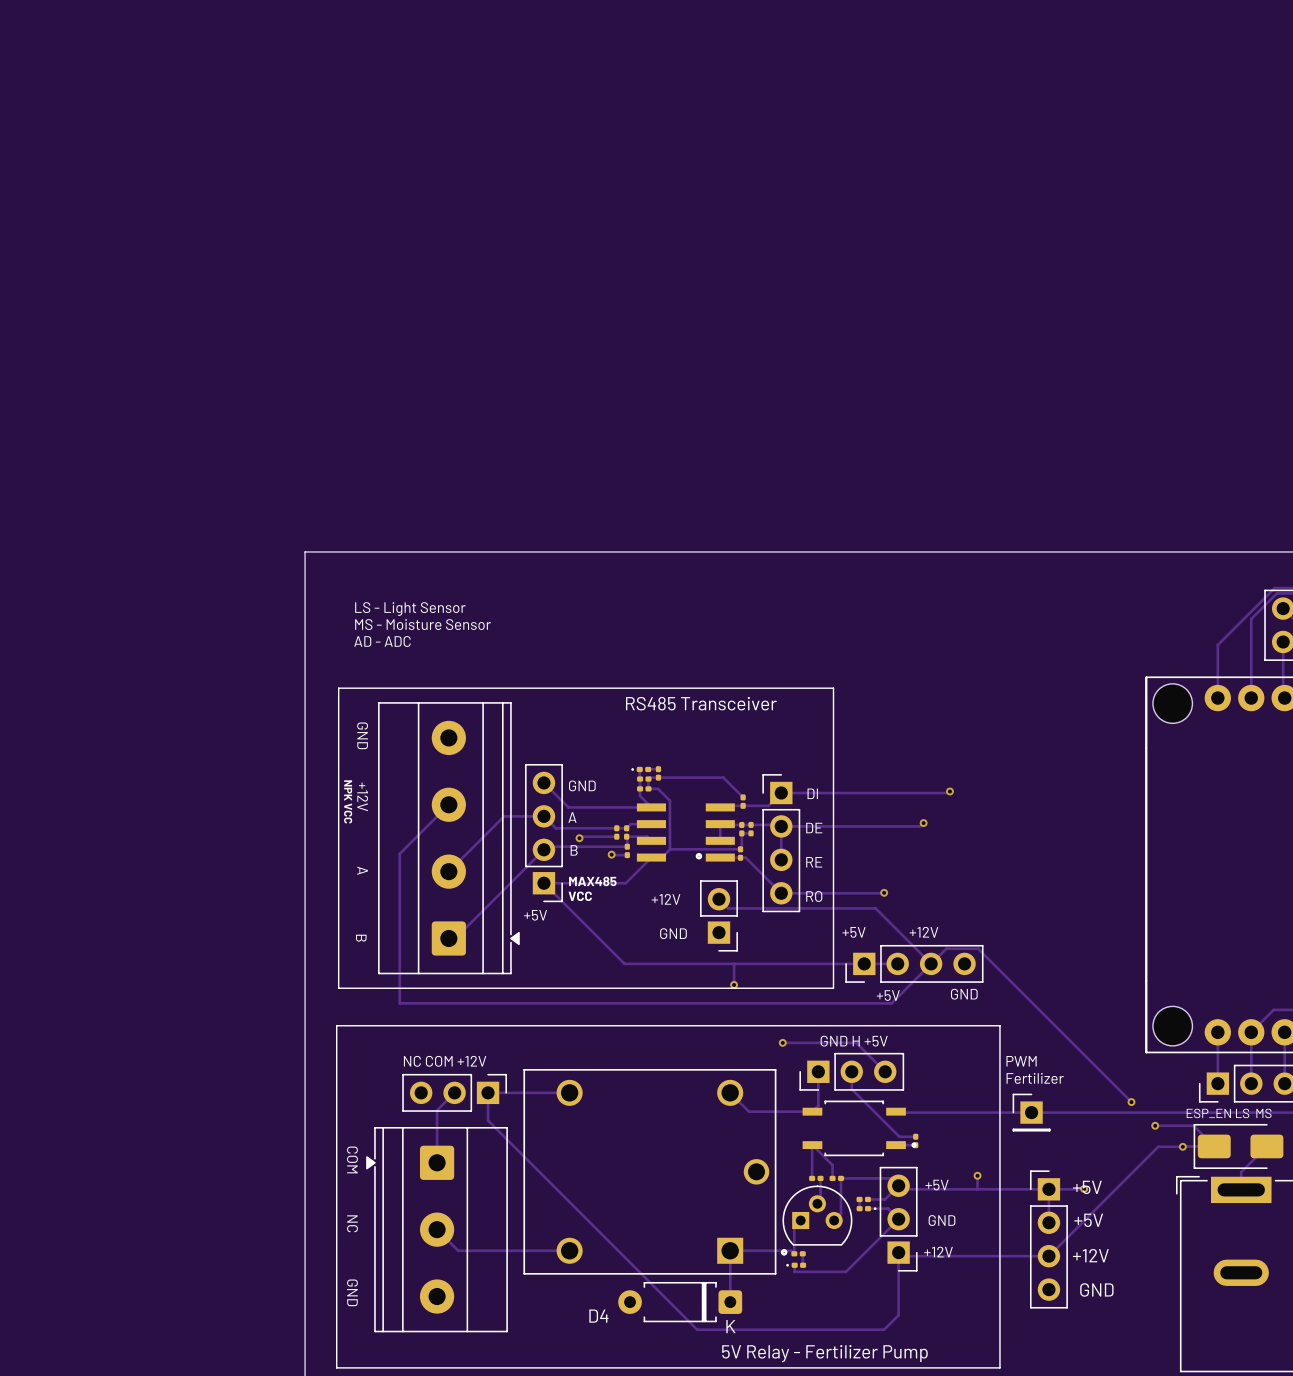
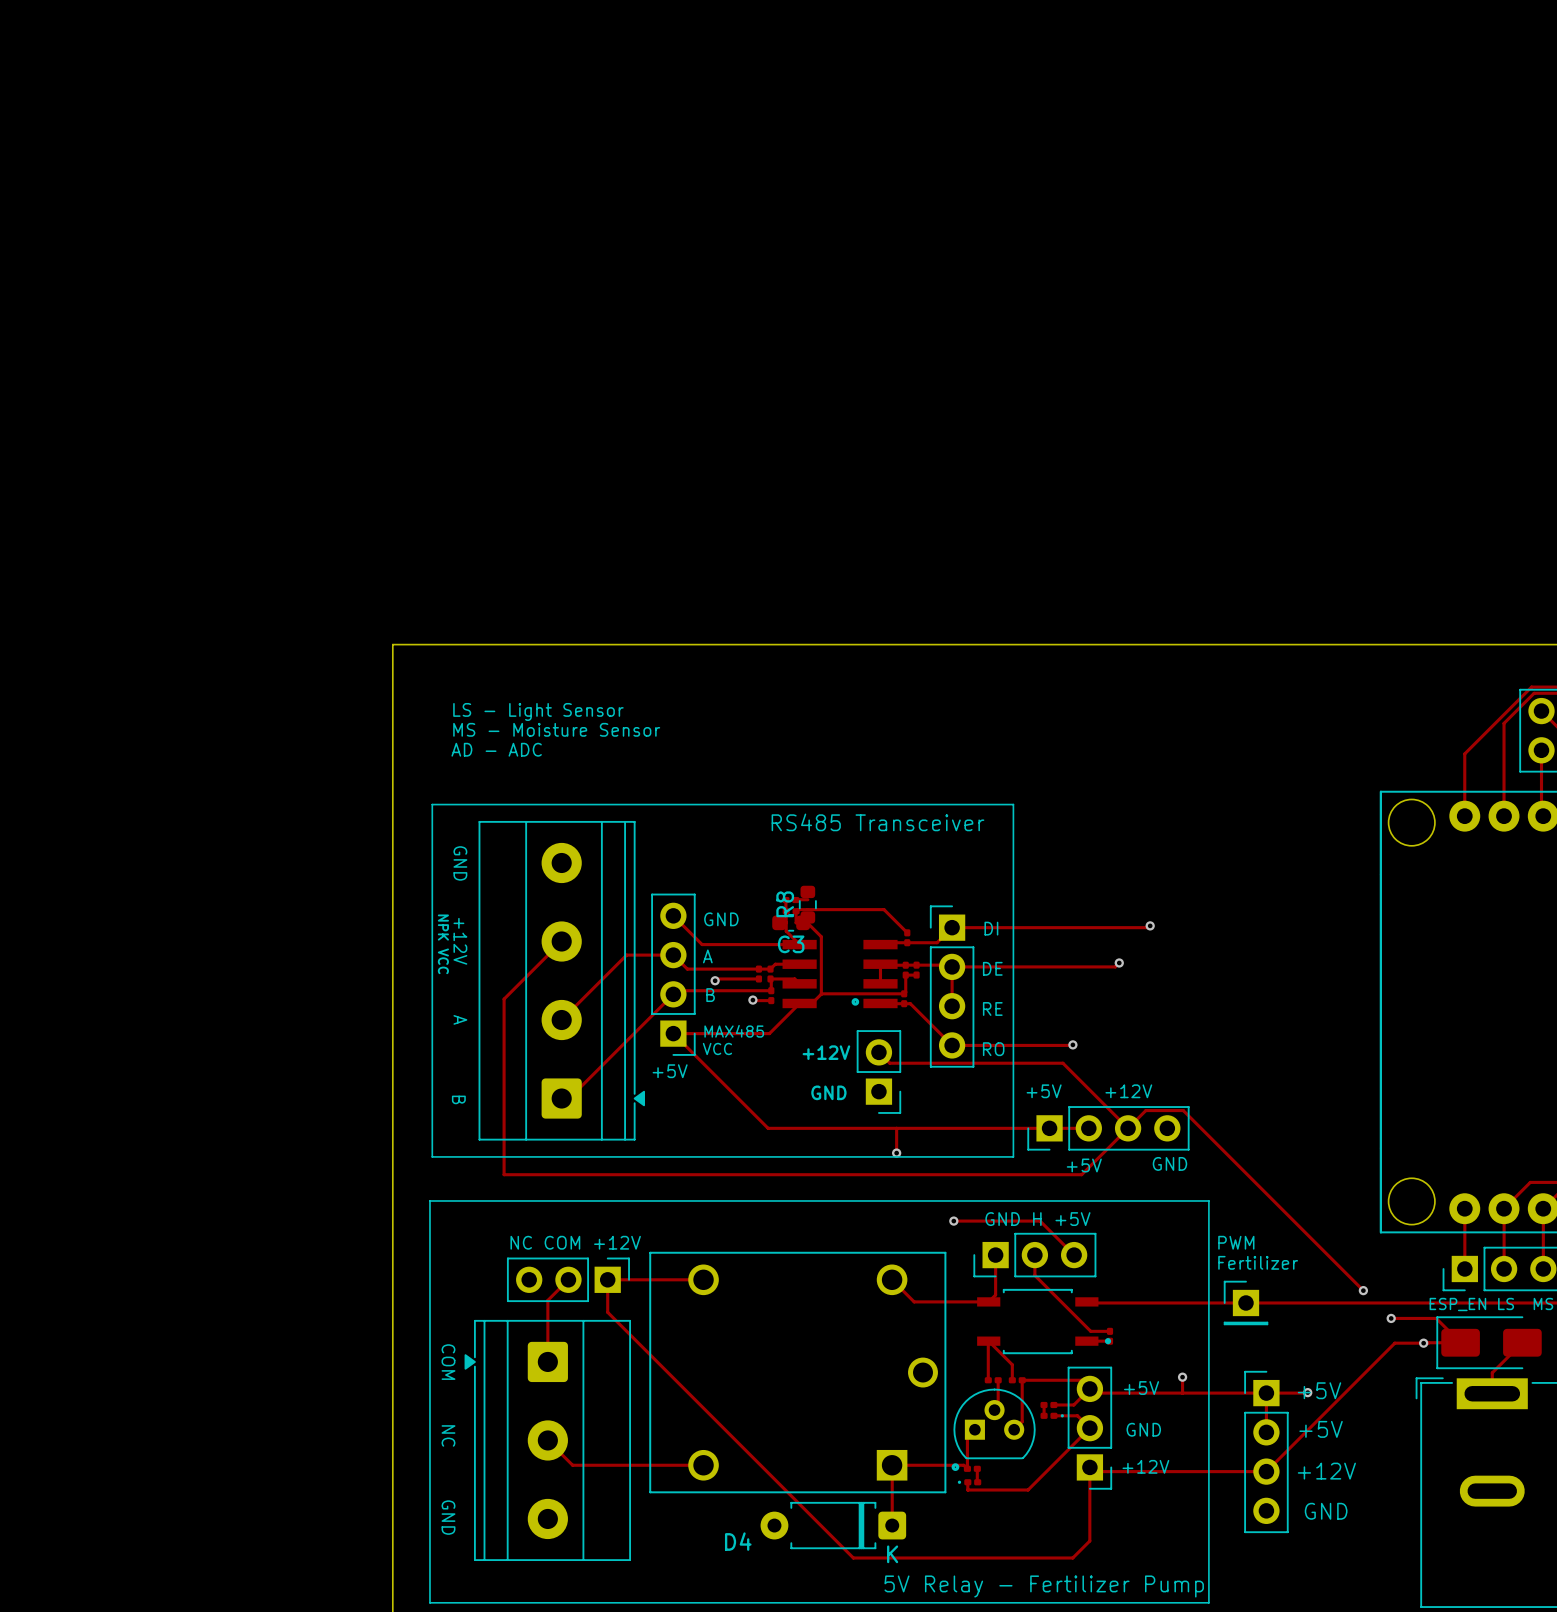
part: (658, 773) -> none
R8: none -> (807, 904)
part: (644, 788) -> none
C3: none -> (791, 922)

